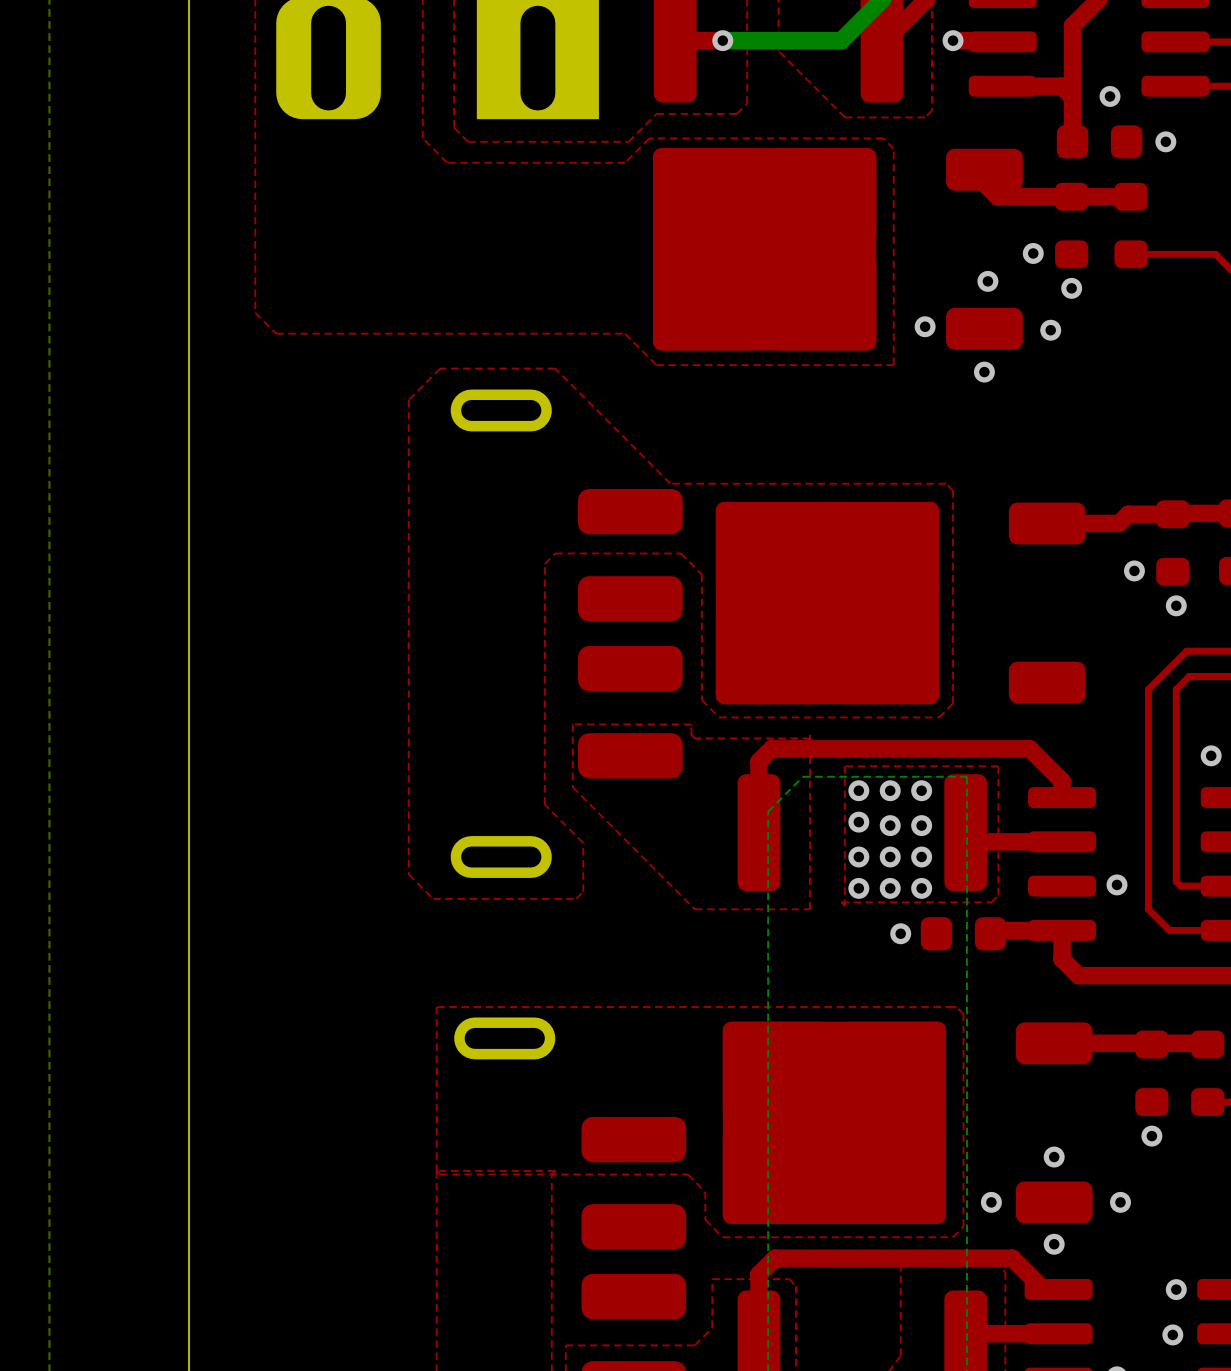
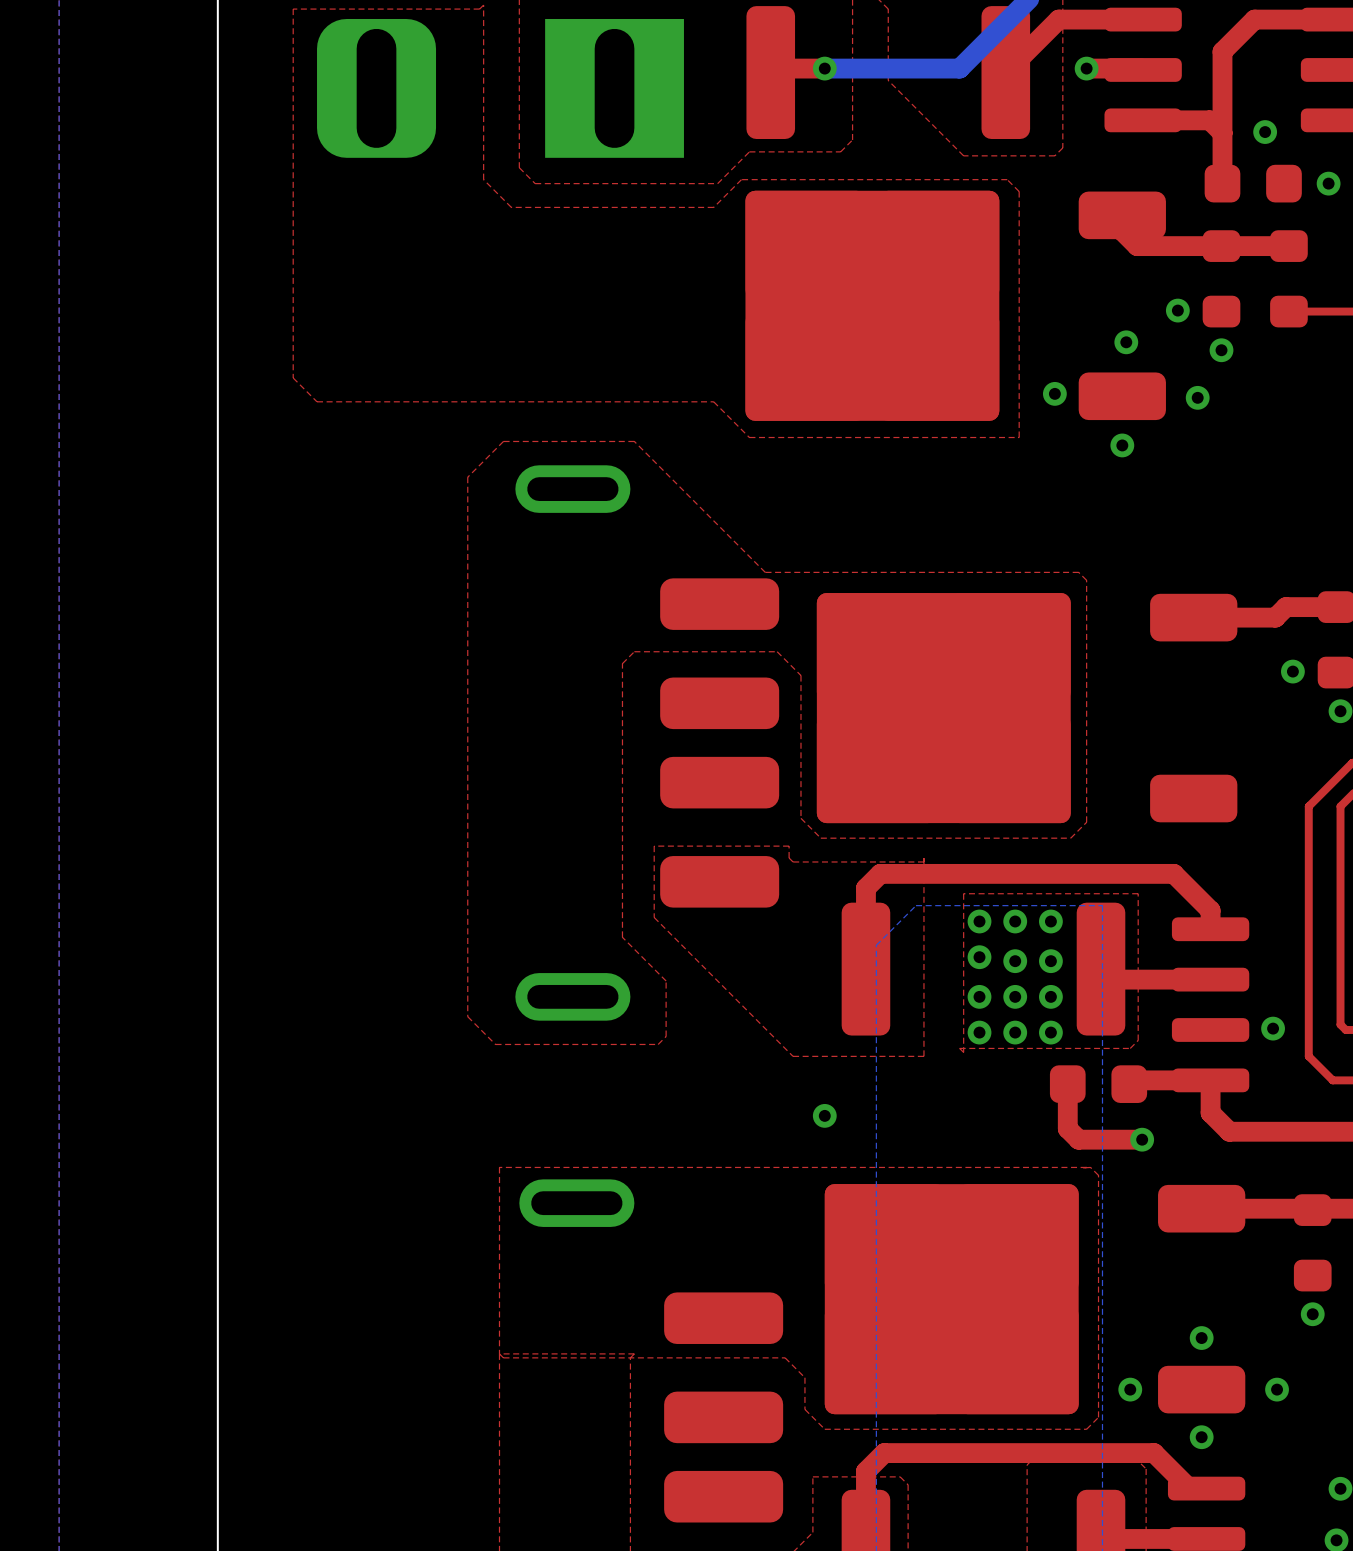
via: (900, 933) -> none
top track: none -> (1067, 1084) (1067, 1128) (1078, 1139) (1142, 1139)
via: none -> (824, 1115)
via: none -> (1142, 1139)

